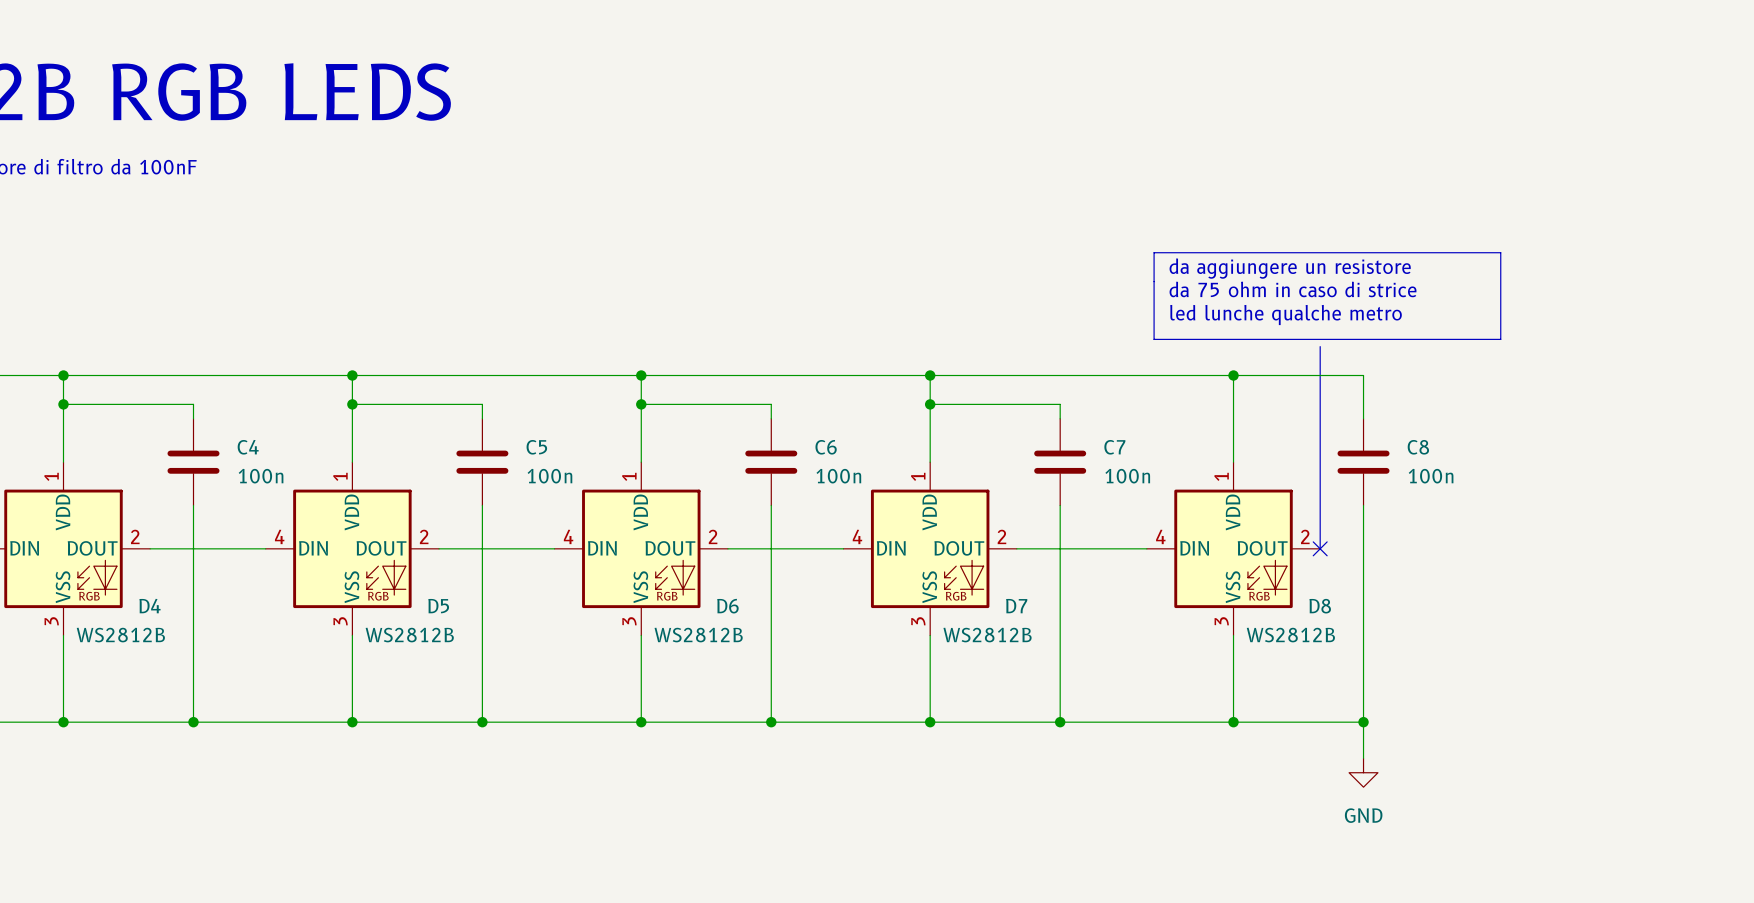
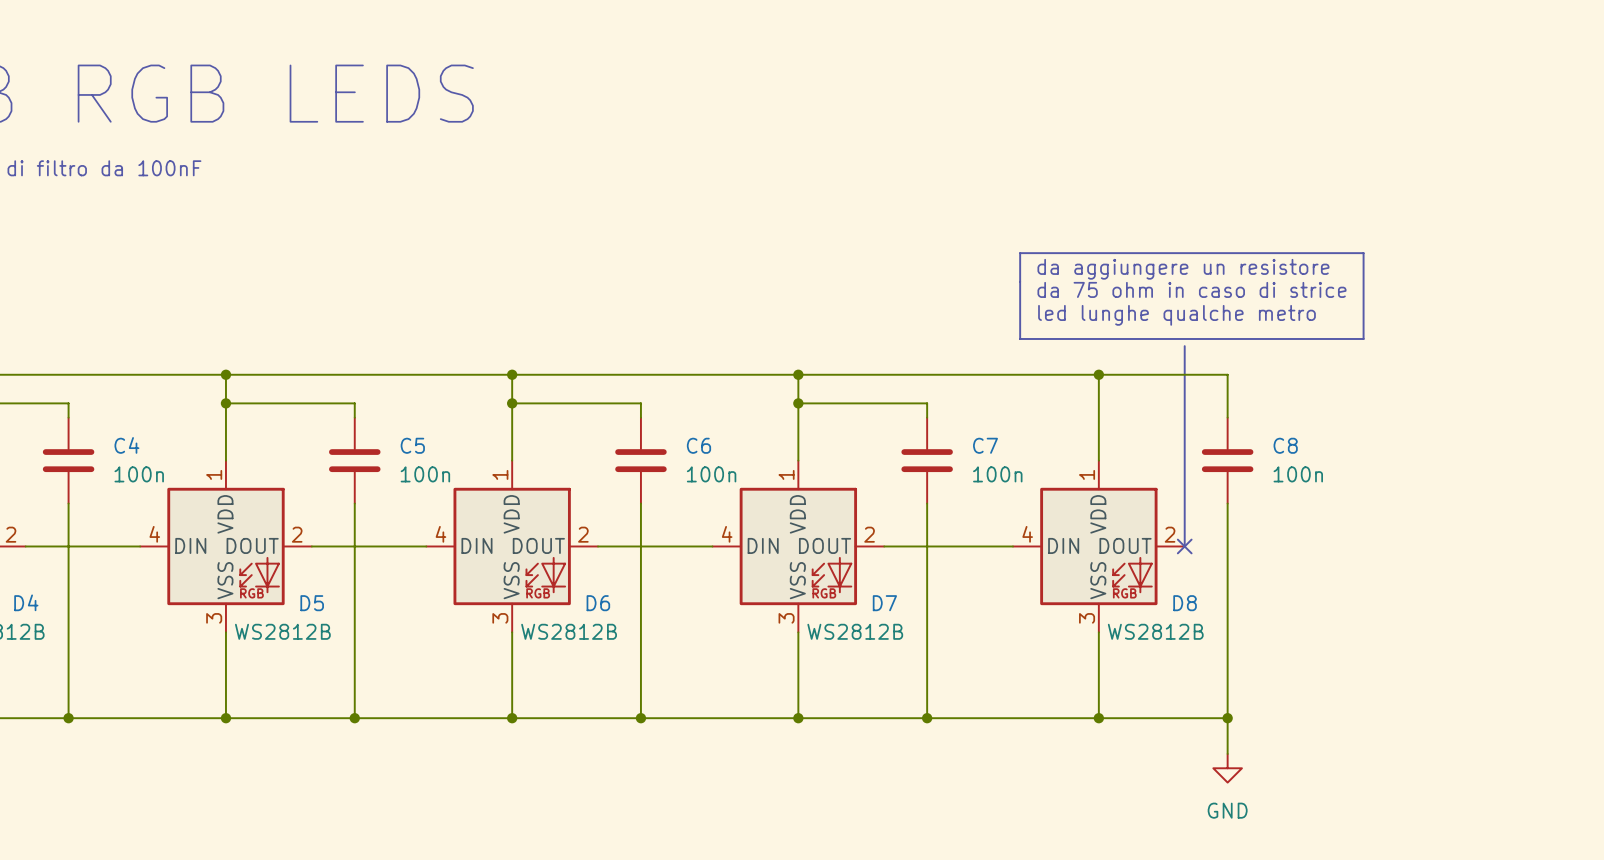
text: led lunche qualche metro (1286, 315) -> led lunghe qualche metro (1176, 315)

